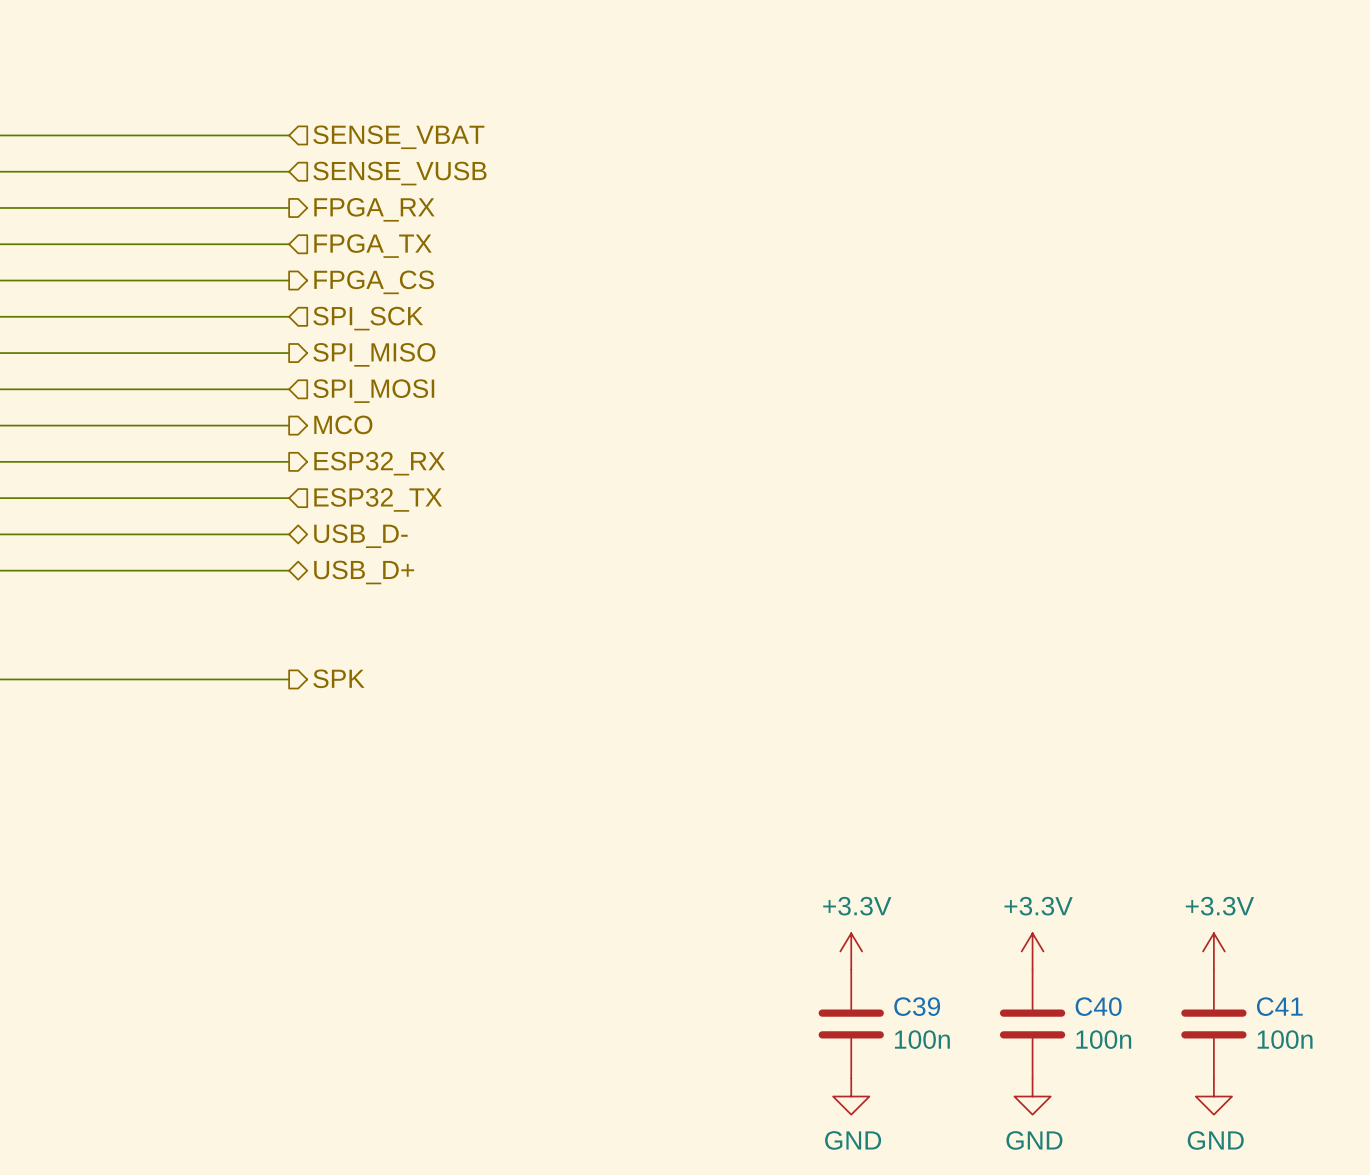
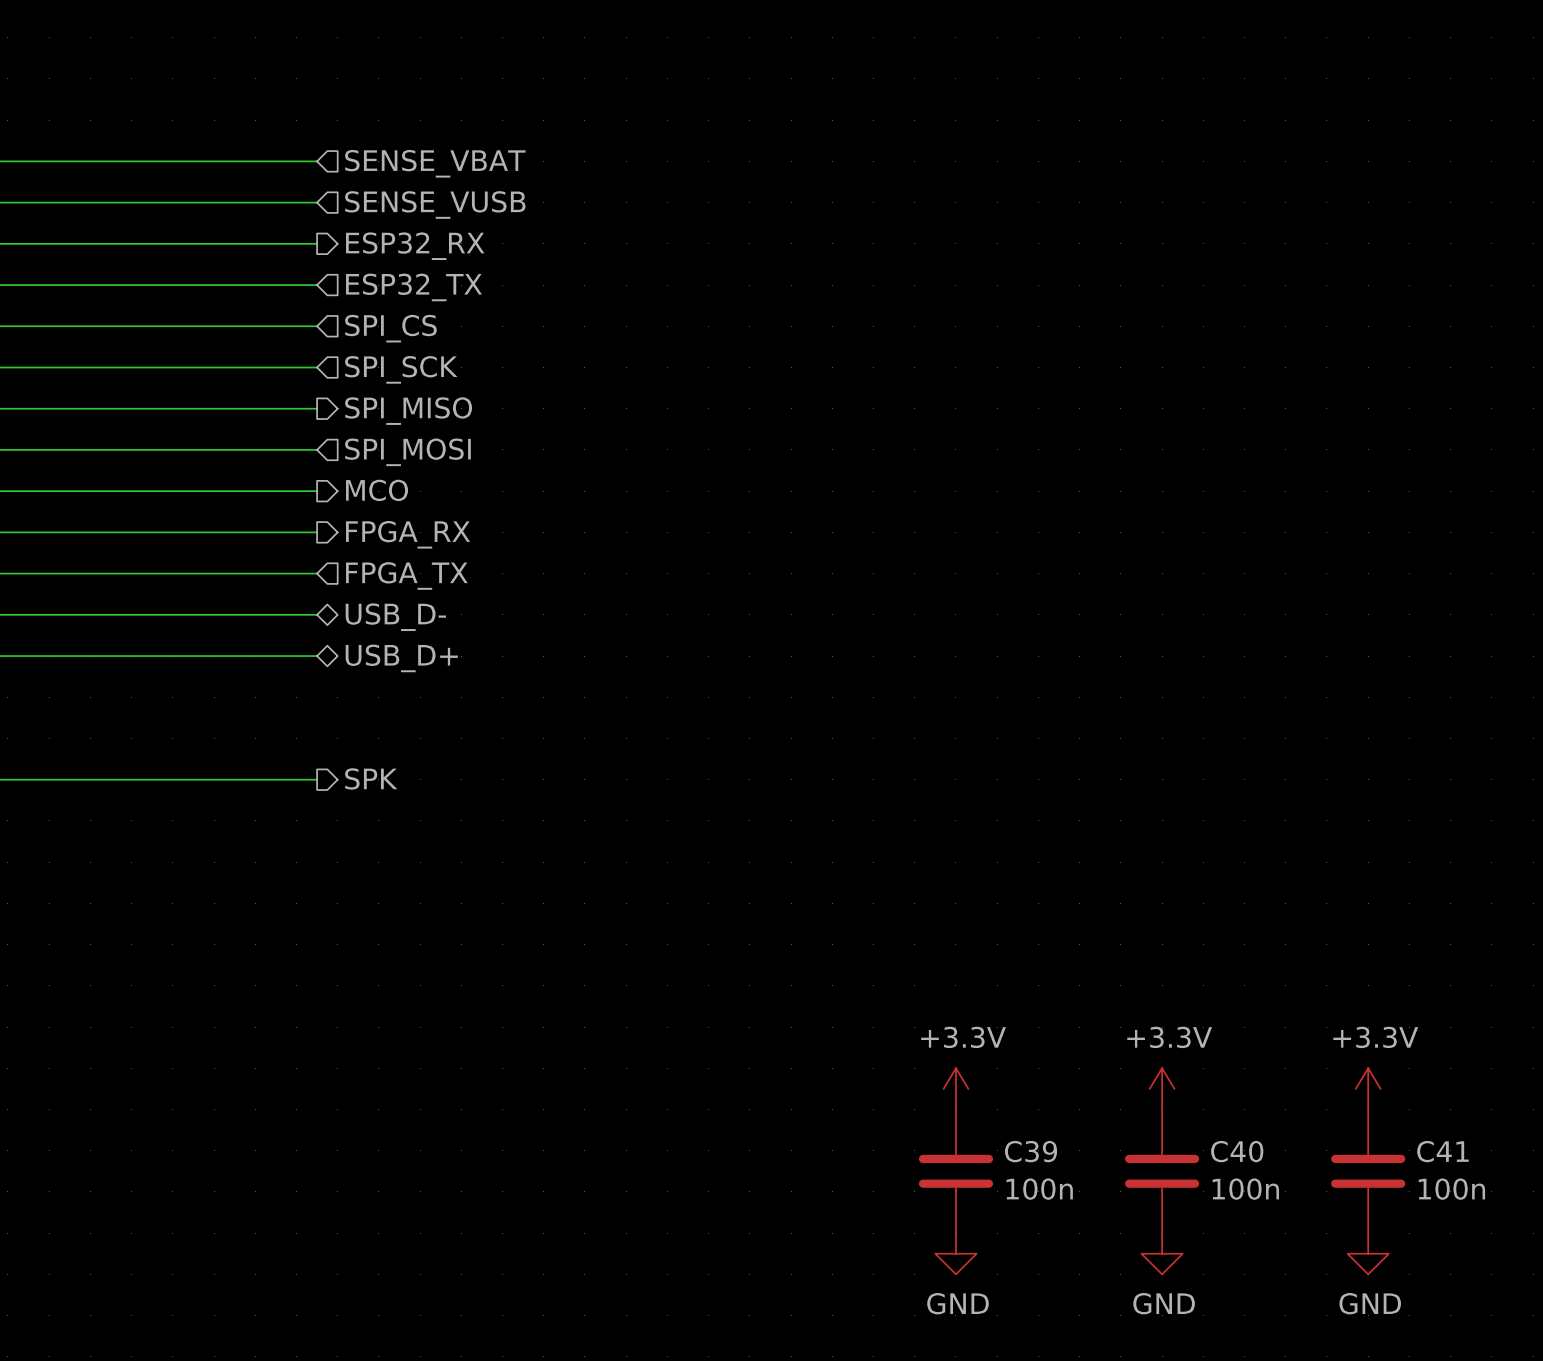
hierarchical label: FPGA_RX (374, 209) -> ESP32_RX (415, 246)
hierarchical label: FPGA_TX (372, 246) -> ESP32_TX (413, 287)
hierarchical label shape: output (374, 282) -> input (390, 328)
hierarchical label: FPGA_CS (374, 282) -> SPI_CS (390, 328)
hierarchical label: ESP32_RX (379, 463) -> FPGA_RX (408, 534)
hierarchical label: ESP32_TX (378, 499) -> FPGA_TX (406, 575)

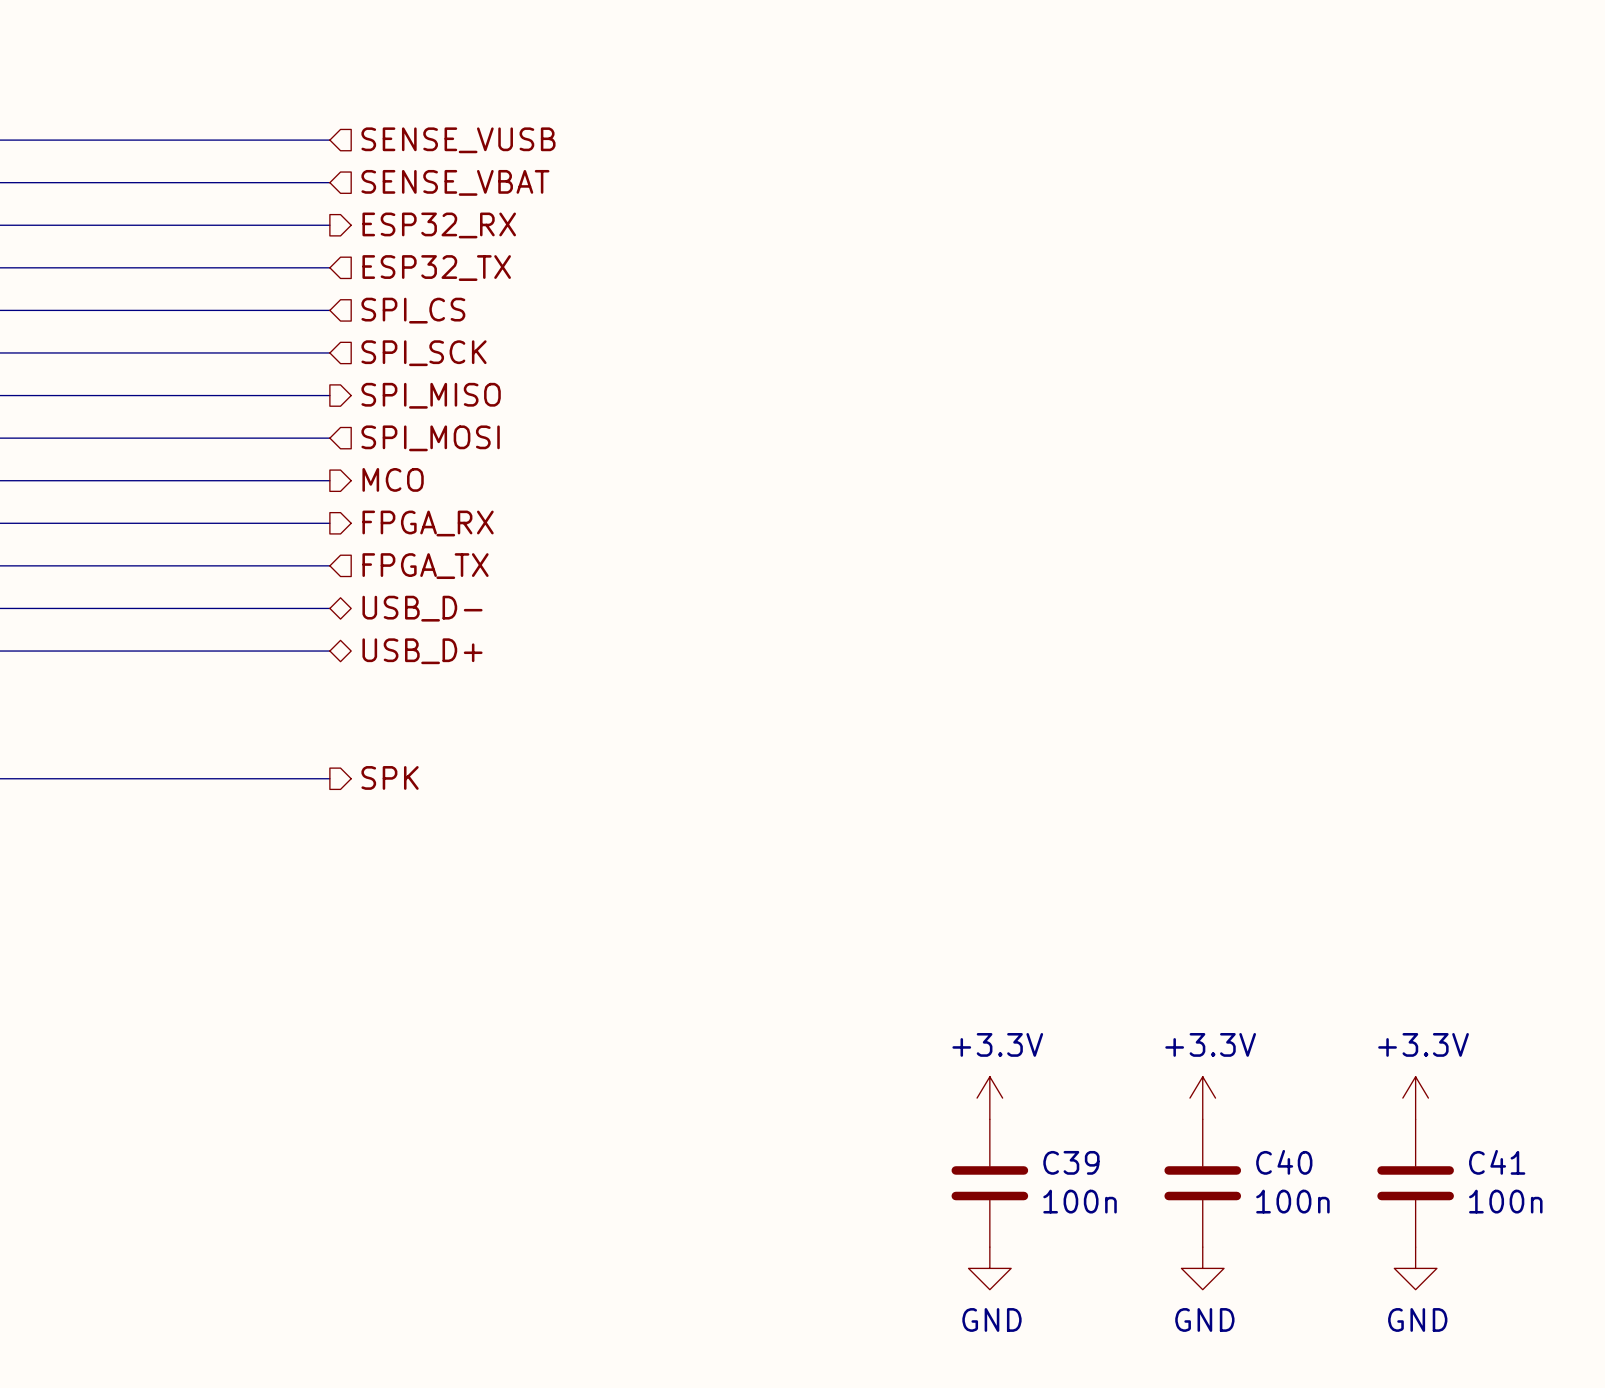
hierarchical label: SENSE_VBAT (435, 163) -> SENSE_VUSB (458, 140)
hierarchical label: SENSE_VUSB (435, 204) -> SENSE_VBAT (455, 182)

